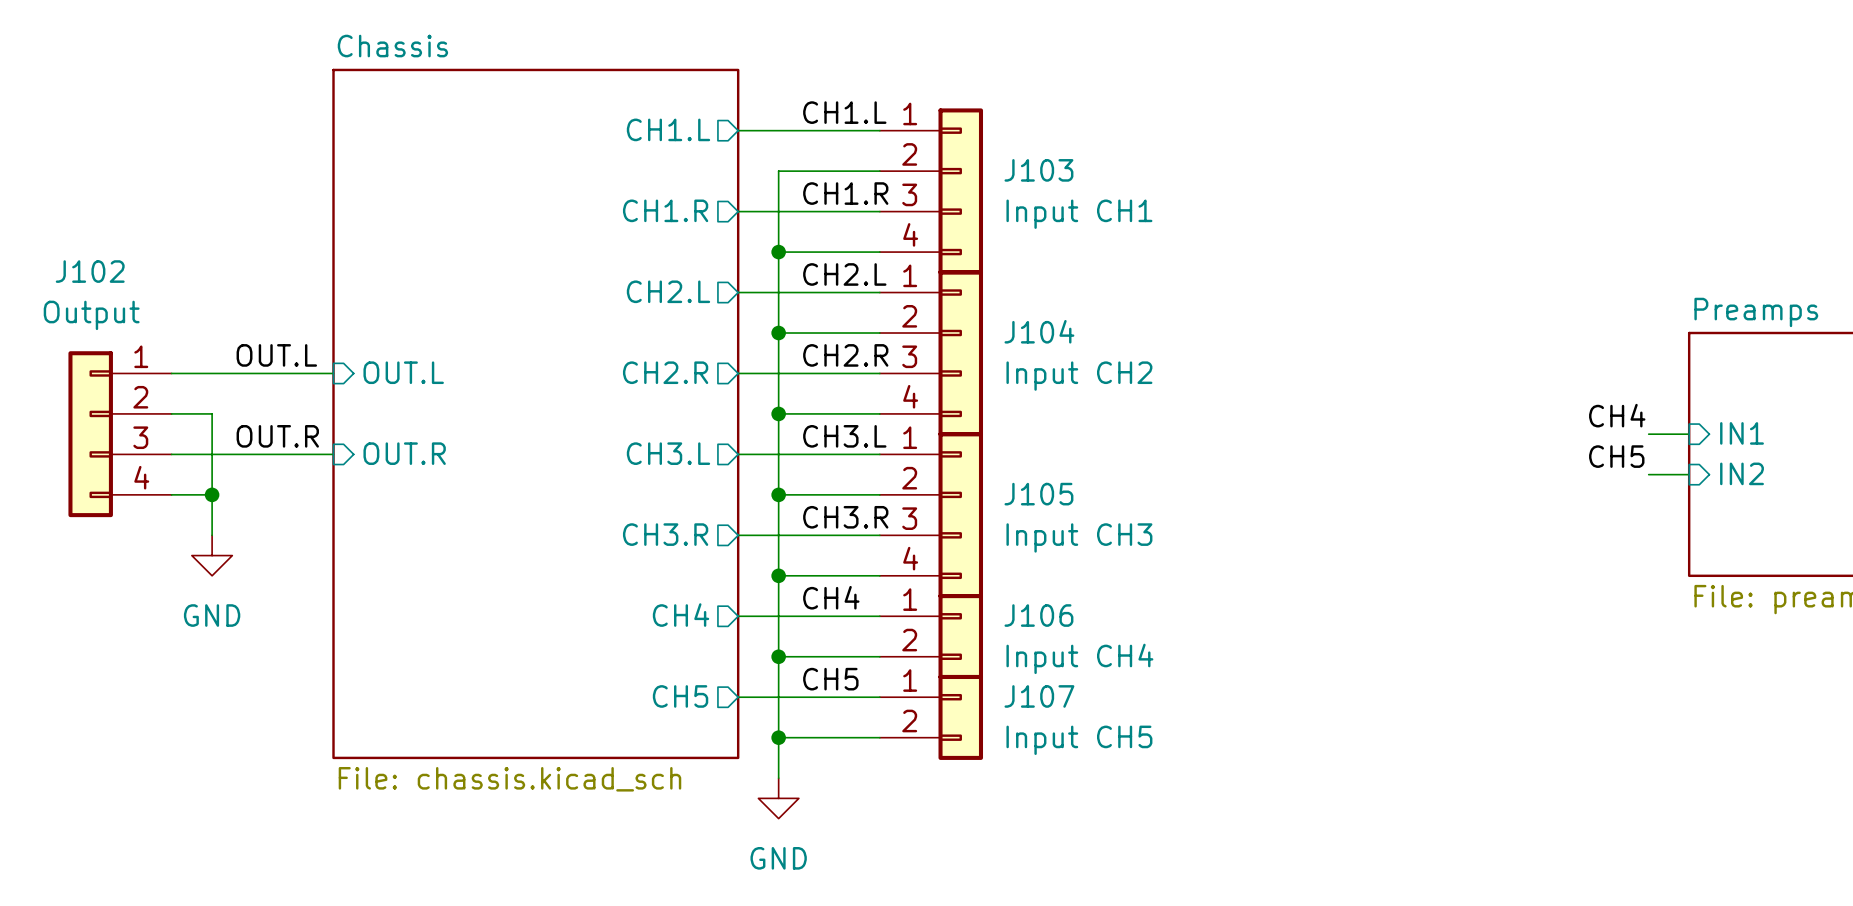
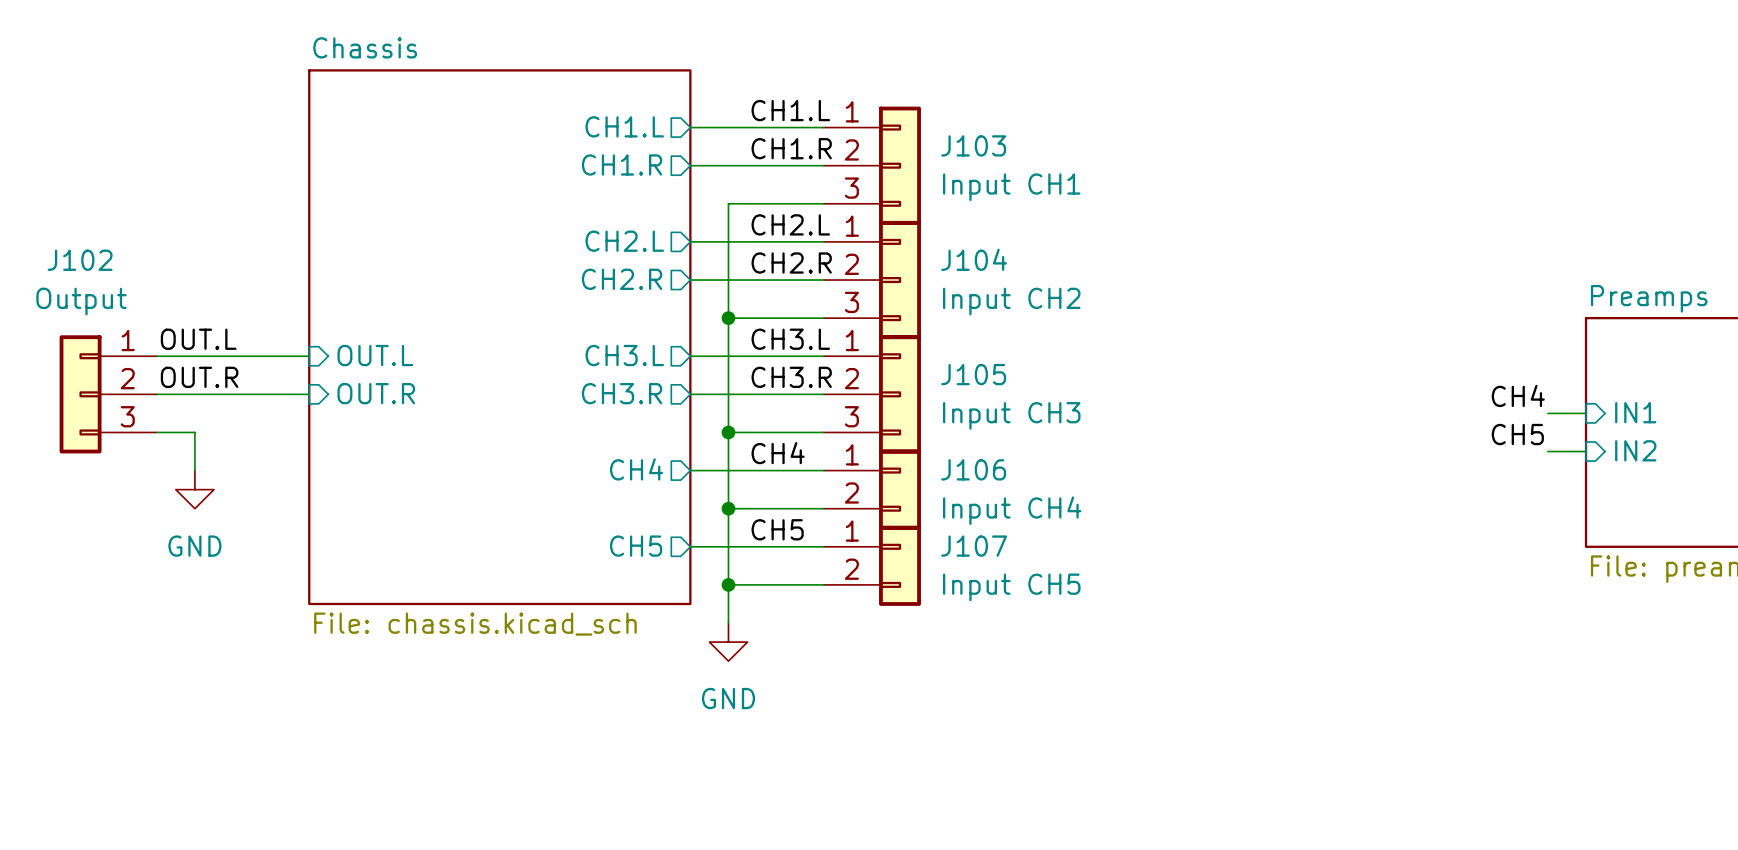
J103 symbol: [879, 108, 984, 275] -> [823, 106, 921, 225]
wire: (778, 171) (778, 211) (738, 211) -> (728, 165) (690, 165)
label position: CH1.R (845, 193) -> CH1.R (791, 148)
sheet pin position: CH1.R (665, 210) -> CH1.R (622, 164)
label: none -> CH2.L (790, 224)
sheet pin: none -> CH2.L (624, 241)
wire: none -> (690, 241) (728, 241)
junction: (778, 252) -> none
J104 symbol: [879, 270, 984, 437] -> [823, 220, 921, 340]
label: CH2.L (844, 274) -> CH2.R (791, 263)
sheet pin: CH2.L (668, 291) -> CH2.R (622, 279)
J102 symbol: [68, 351, 172, 518] -> [59, 335, 157, 454]
sheet Chassis: none -> File: chassis.kicad_sch (499, 337)
label position: OUT.L (276, 355) -> OUT.L (198, 339)
label: CH2.R (845, 355) -> CH3.L (790, 339)
sheet pin: CH2.R (665, 372) -> CH3.L (624, 355)
wire: (212, 413) (212, 454) (333, 454) -> (194, 394) (309, 394)
sheet Chassis: File: chassis.kicad_sch (535, 413) -> none
junction: (778, 413) -> none
J105 symbol: [879, 432, 984, 599] -> [823, 335, 921, 454]
label position: OUT.R (277, 436) -> OUT.R (199, 377)
label: CH3.L (844, 436) -> none
sheet pin position: OUT.R (404, 453) -> OUT.R (376, 393)
sheet pin: CH3.L (668, 453) -> none
wire: (738, 454) (778, 454) -> (690, 394) (728, 394)
junction: none -> (728, 432)
wire: (171, 494) (212, 494) (212, 535) -> none
junction: (212, 494) -> none
junction: (778, 494) -> none
label position: CH3.R (845, 517) -> CH3.R (791, 377)
sheet pin position: CH3.R (665, 534) -> CH3.R (622, 393)
wire: (738, 535) (778, 535) -> (690, 470) (728, 470)
junction: none -> (728, 508)
power symbol position: GND (212, 555) -> GND (194, 489)
junction: (778, 575) -> none
label position: CH4 (831, 597) -> CH4 (778, 453)
sheet pin position: CH4 (681, 615) -> CH4 (636, 469)
wire: (738, 616) (778, 616) -> (690, 546) (728, 546)
junction: none -> (728, 584)
J106 position: (931, 636) -> (872, 489)
junction: (778, 656) -> none
wire: (879, 656) (778, 656) (778, 778) -> none
label position: CH5 (830, 679) -> CH5 (777, 529)
sheet pin position: CH5 (680, 696) -> CH5 (636, 546)
wire: (738, 697) (879, 697) -> none
J107 position: (931, 717) -> (872, 565)
wire: (778, 737) (879, 737) -> none
junction: (778, 737) -> none
power symbol position: GND (778, 798) -> GND (728, 642)

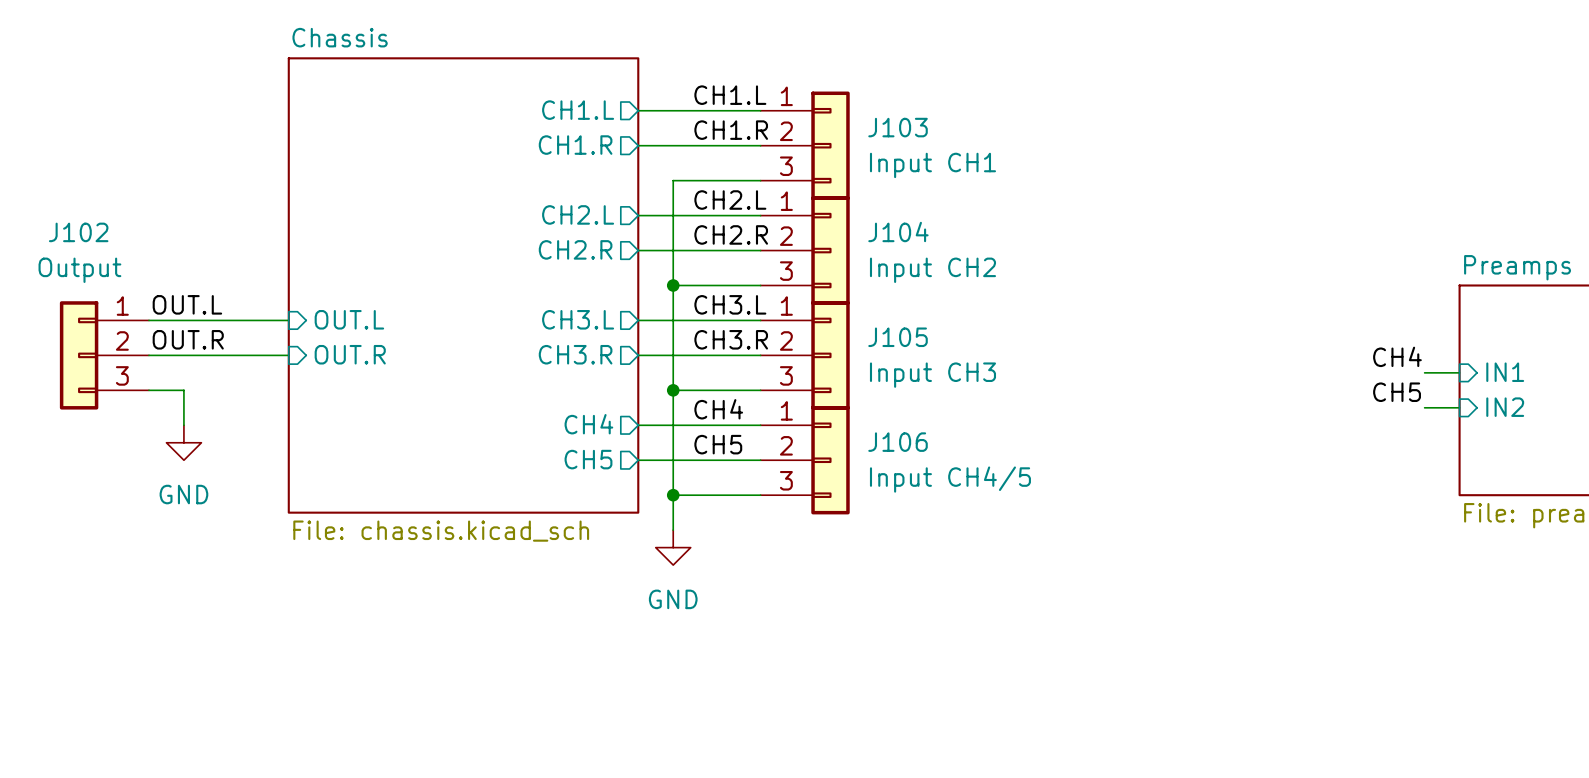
sheet Chassis: none -> File: chassis.kicad_sch (463, 285)
sheet Chassis: File: chassis.kicad_sch (499, 337) -> none
J106 symbol: [823, 449, 921, 530] -> [760, 406, 850, 515]
junction: (728, 508) -> none
J106 value: Input CH4 (1012, 510) -> Input CH4/5 (950, 479)
label position: CH5 (777, 529) -> CH5 (718, 444)
sheet pin position: CH5 (636, 546) -> CH5 (588, 459)
wire: (690, 546) (728, 546) -> (638, 460) (673, 460)
junction: none -> (673, 495)
J107: Input CH5 (872, 565) -> none
junction: (728, 584) -> none
wire: (823, 584) (728, 584) (728, 623) -> none
power symbol position: GND (728, 642) -> GND (673, 547)

